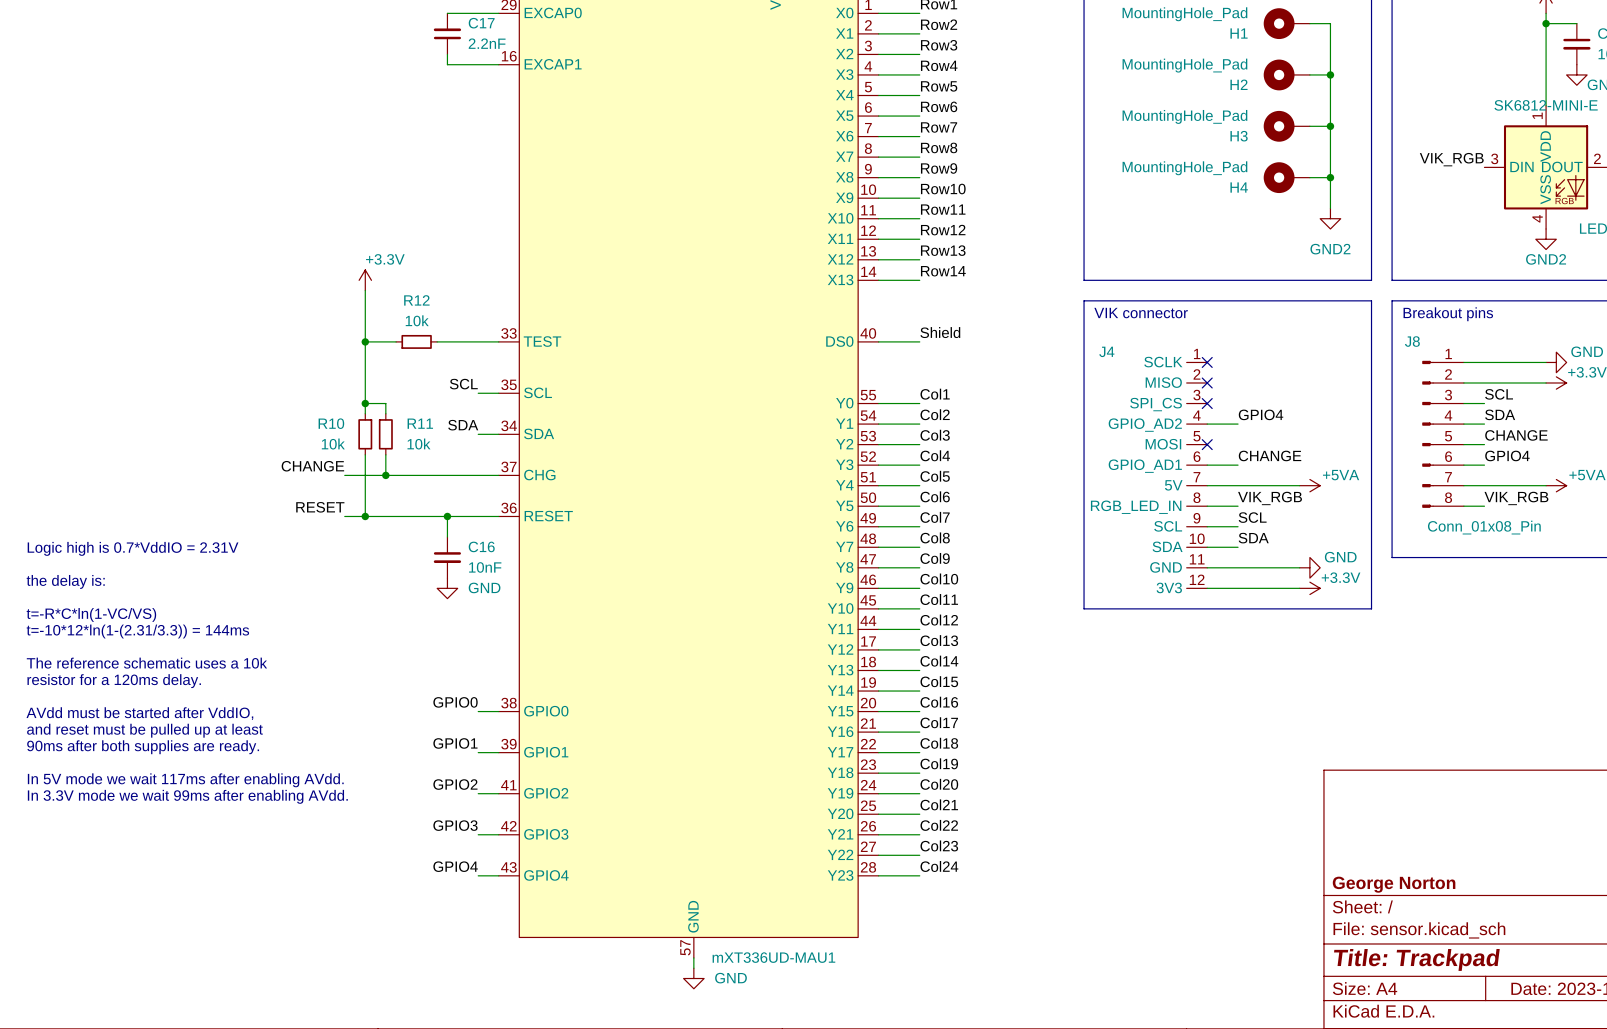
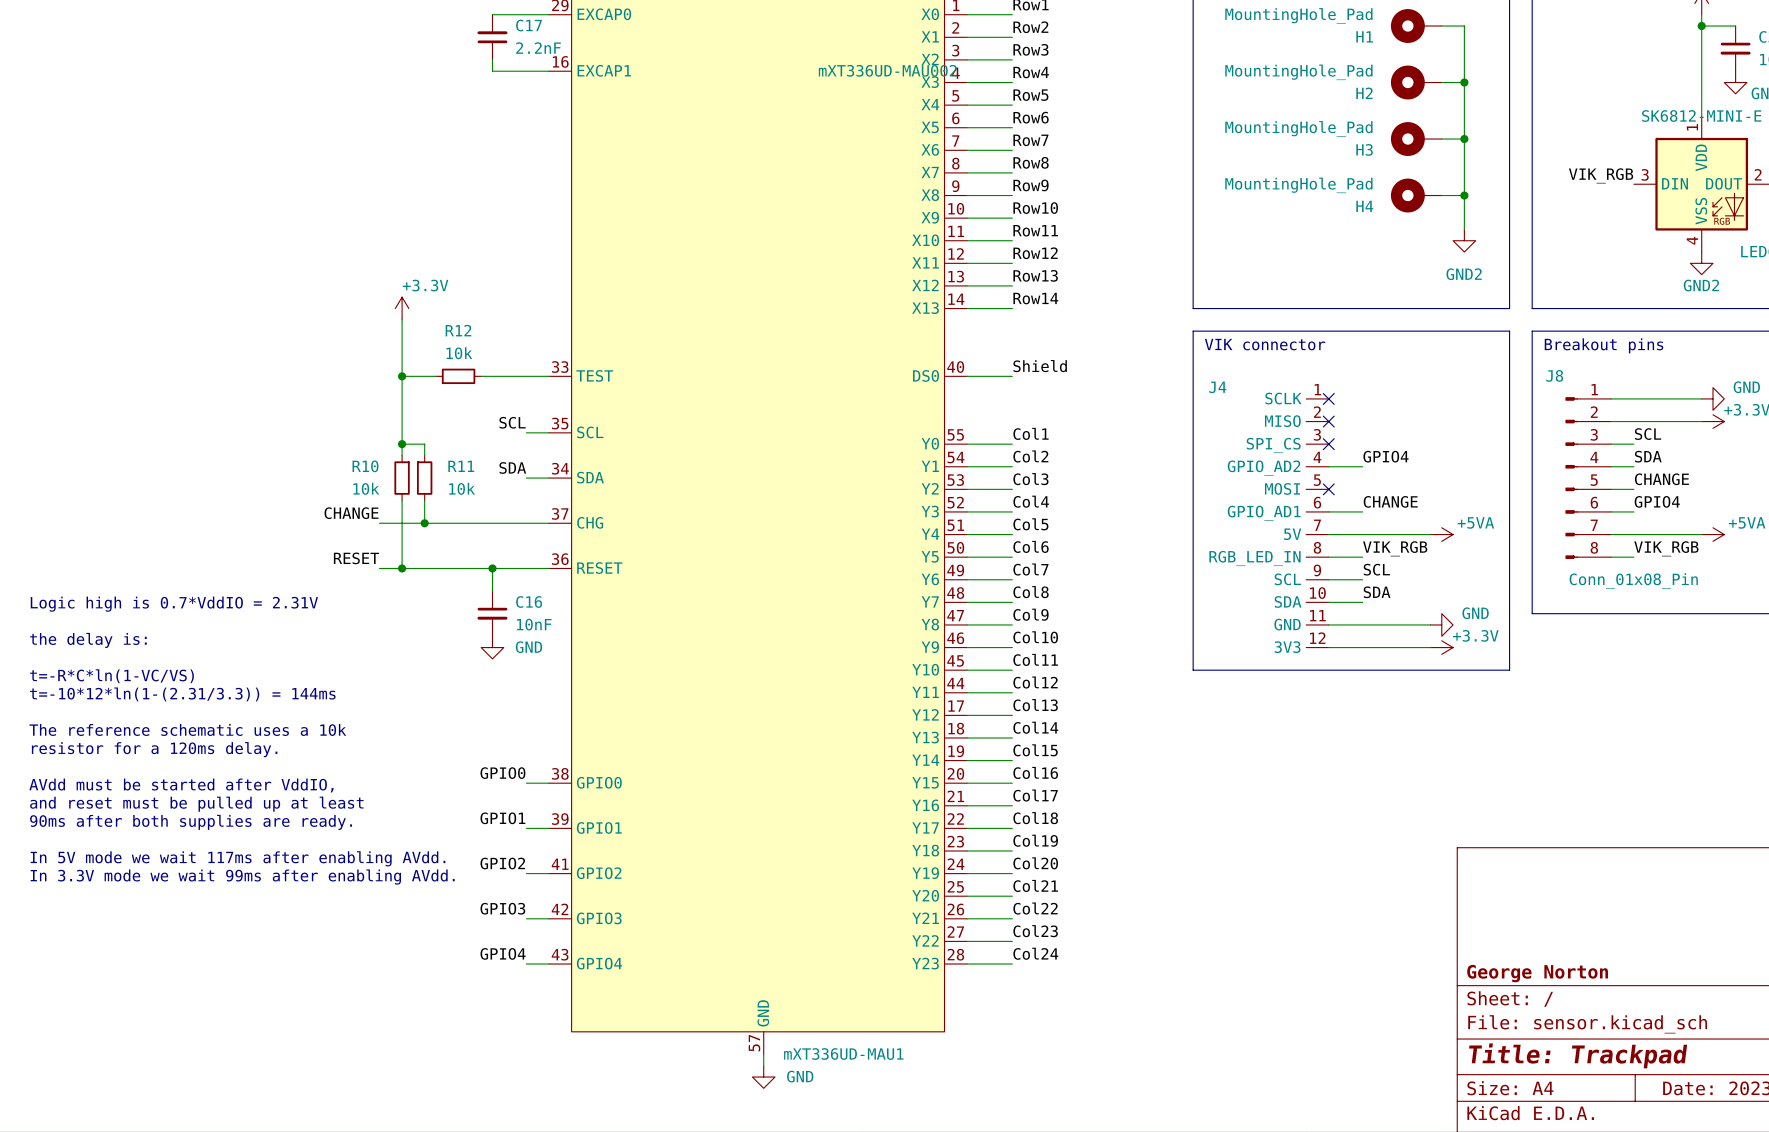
mXT336UD-MAU1 value: none -> mXT336UD-MAU002 (887, 70)

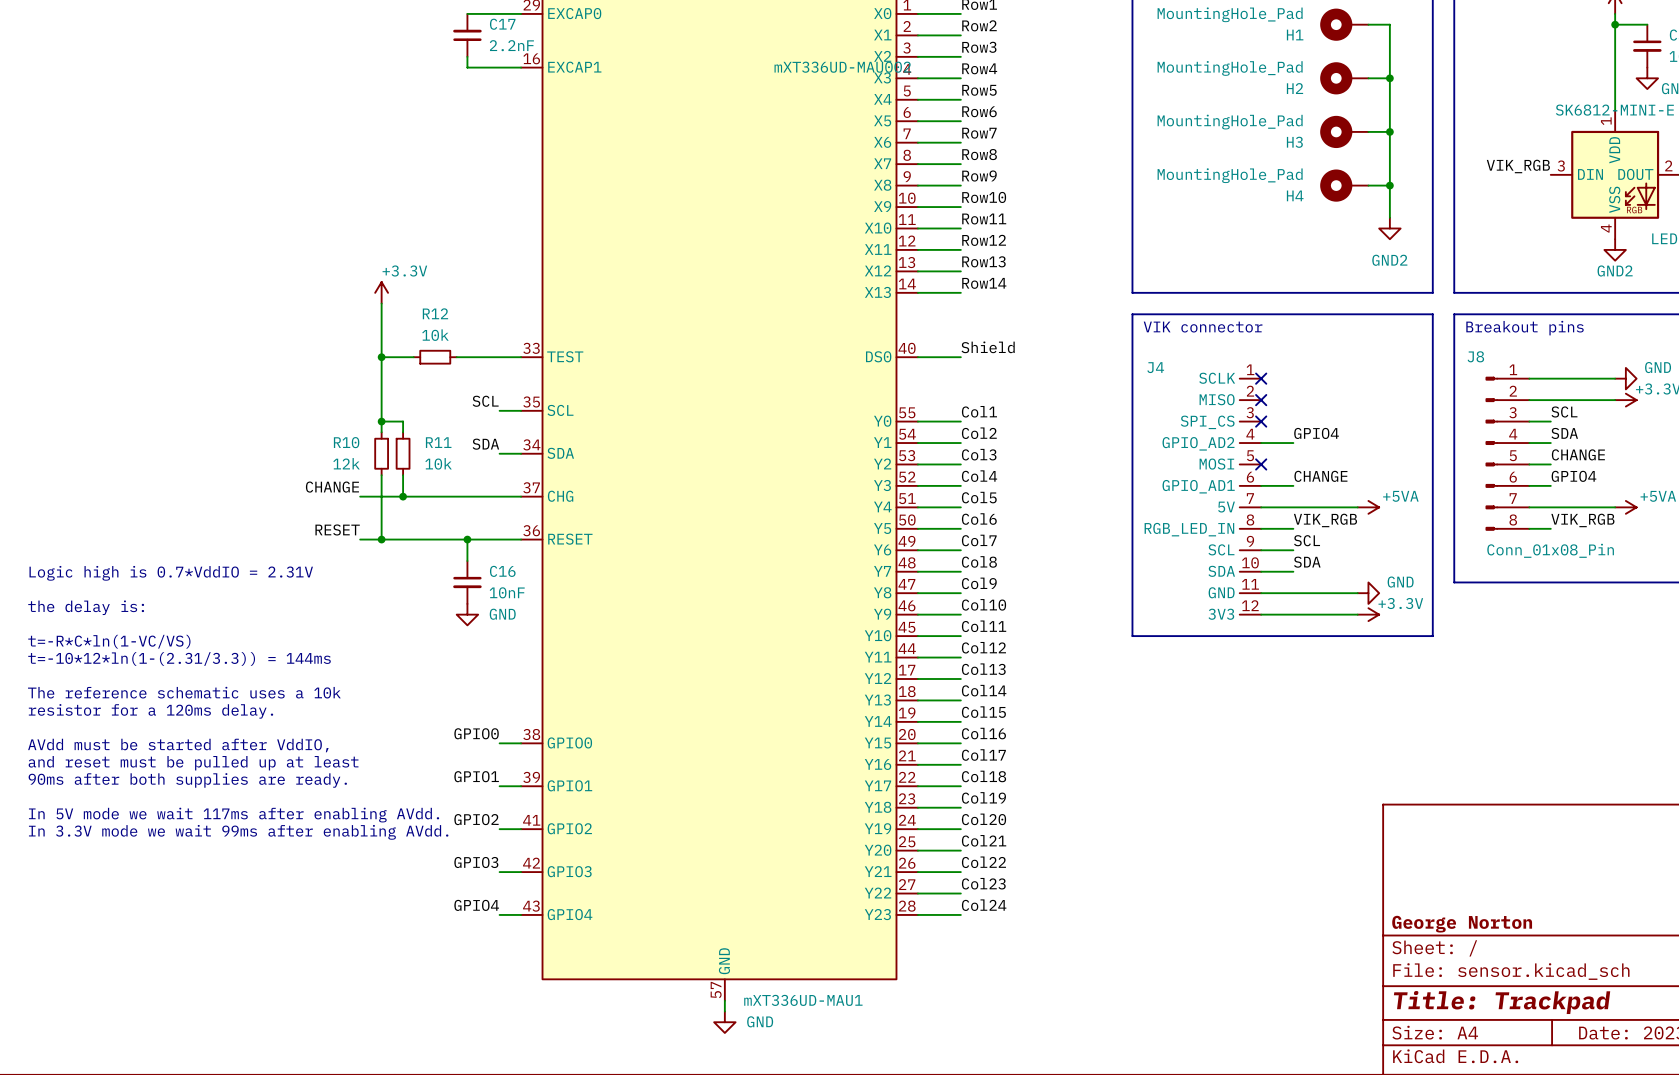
R10 value: 10k (366, 488) -> 12k (346, 463)

